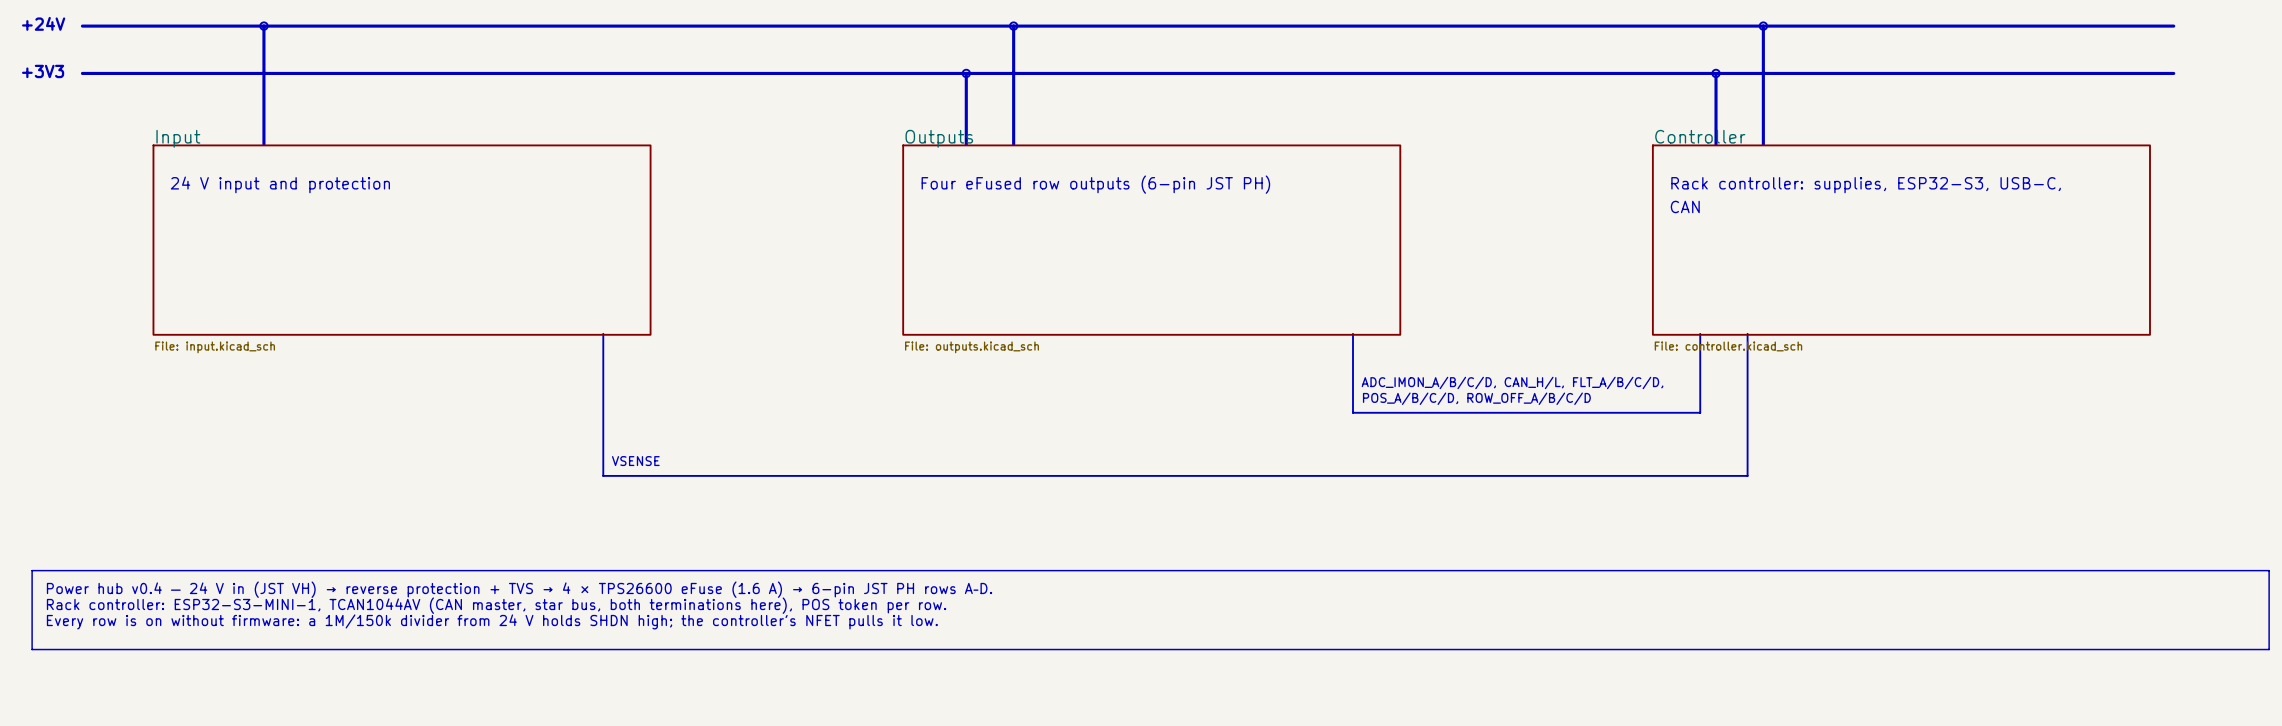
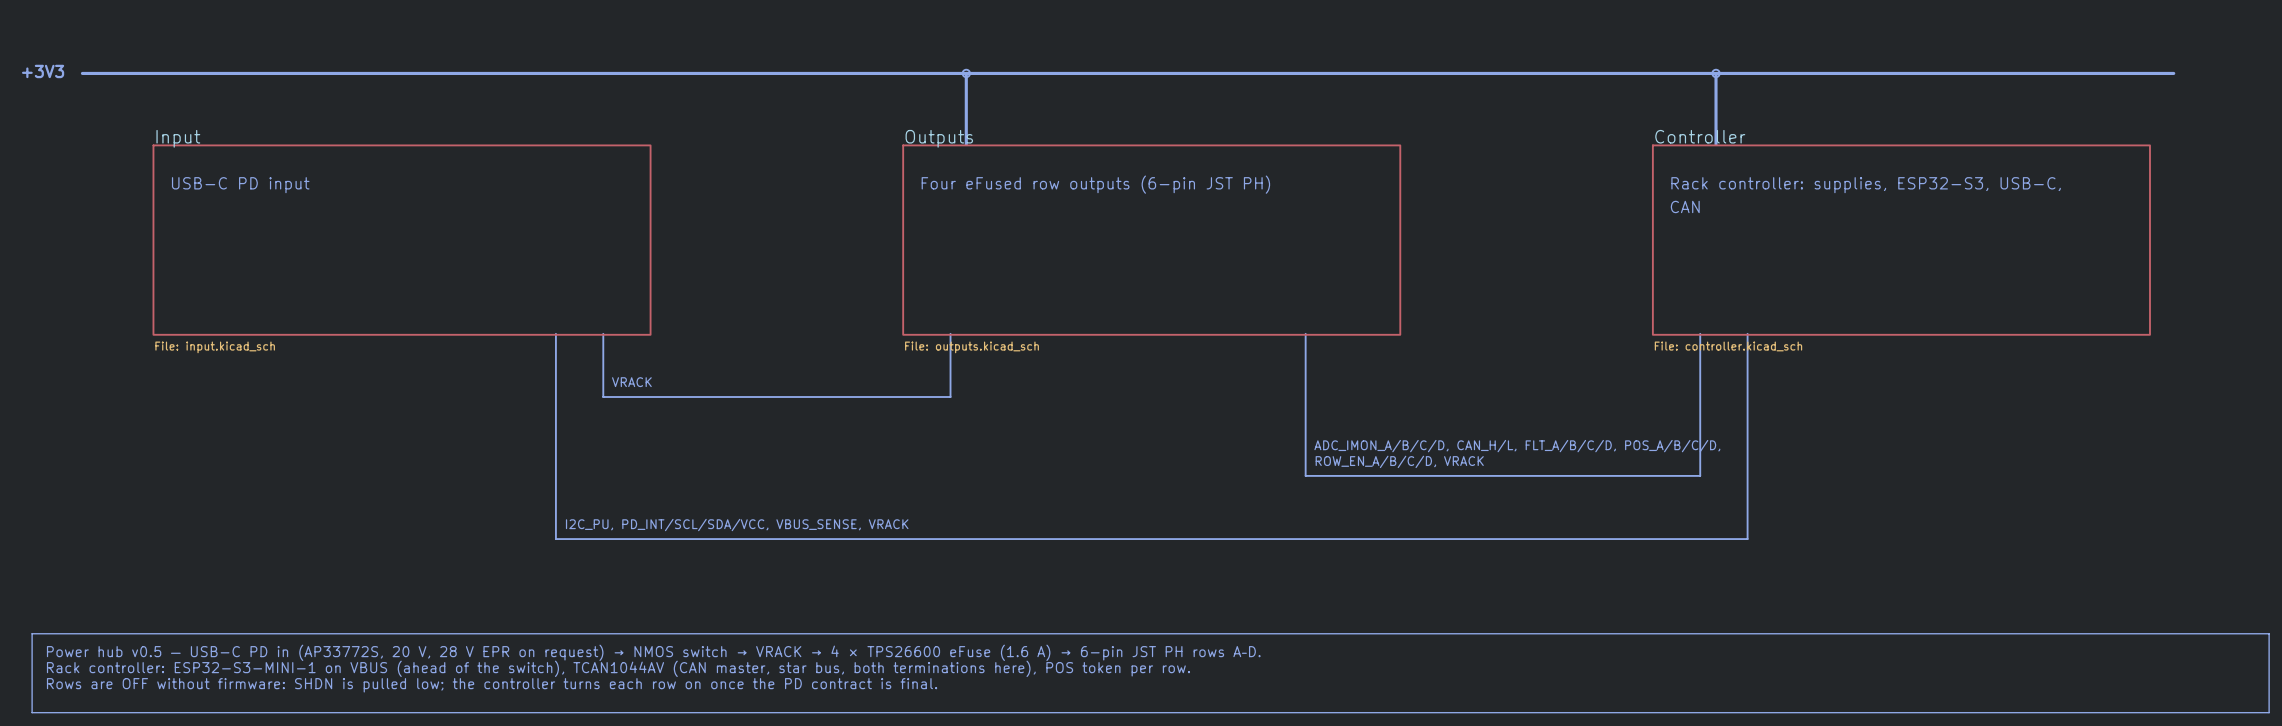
drawing: [259, 21, 269, 31] -> none
drawing: [1008, 21, 1019, 31] -> none
drawing: [1758, 21, 1769, 31] -> none
text: +24V (43, 23) -> none
line: (82, 26) (2173, 26) -> none
line: (263, 26) (263, 144) -> none
line: (1013, 26) (1013, 144) -> none
line: (1763, 26) (1763, 144) -> none
text: 24 V input and protection (280, 184) -> USB-C PD input (240, 185)
line: none -> (555, 333) (555, 539) (1747, 539) (1747, 475)
line: none -> (1305, 333) (1305, 475)
line: (1352, 333) (1352, 412) (1700, 412) -> none
text: none -> VRACK (631, 382)
text: ADC_IMON_A/B/C/D, CAN_H/L, FLT_A/B/C/D, (1512, 382) -> none
line: (603, 397) (603, 475) (1305, 475) -> (603, 397) (950, 397) (950, 333)
text: POS_A/B/C/D, ROW_OFF_A/B/C/D (1476, 398) -> none
text: none -> ADC_IMON_A/B/C/D, CAN_H/L, FLT_A/B/C/D, POS_A/B/C/D, (1517, 446)
text: VSENSE (635, 461) -> none
text: none -> ROW_EN_A/B/C/D, VRACK (1399, 461)
line: (1700, 475) (1747, 475) -> (1700, 475) (1700, 412)
text: none -> I2C_PU, PD_INT/SCL/SDA/VCC, VBUS_SENSE, VRACK (737, 525)
text: Power hub v0.4 — 24 V in (JST VH) → reverse protection + TVS → 4 × TPS26600 eFuse (1.6 A) → 6-pin JST PH rows A–D. (519, 589) -> none
text: Rack controller: ESP32-S3-MINI-1, TCAN1044AV (CAN master, star bus, both terminations here), POS token per row. (496, 605) -> none
text: Every row is on without firmware: a 1M/150k divider from 24 V holds SHDN high; the controller's NFET pulls it low. (492, 621) -> none
line: (32, 633) (32, 570) (2269, 570) (2269, 633) -> (32, 633) (2269, 633)
line: (32, 649) (2269, 649) -> (32, 649) (32, 712) (2269, 712) (2269, 649)
text: none -> Power hub v0.5 — USB-C PD in (AP33772S, 20 V, 28 V EPR on request) → NMOS switch → VRACK → 4 × TPS26600 eFuse (1.6 A) → 6-pin JST PH rows A–D. (653, 652)
text: none -> Rack controller: ESP32-S3-MINI-1 on VBUS (ahead of the switch), TCAN1044AV (CAN master, star bus, both terminations here), POS token per row. (618, 668)
text: none -> Rows are OFF without firmware: SHDN is pulled low; the controller turns each row on once the PD contract is final. (492, 685)

